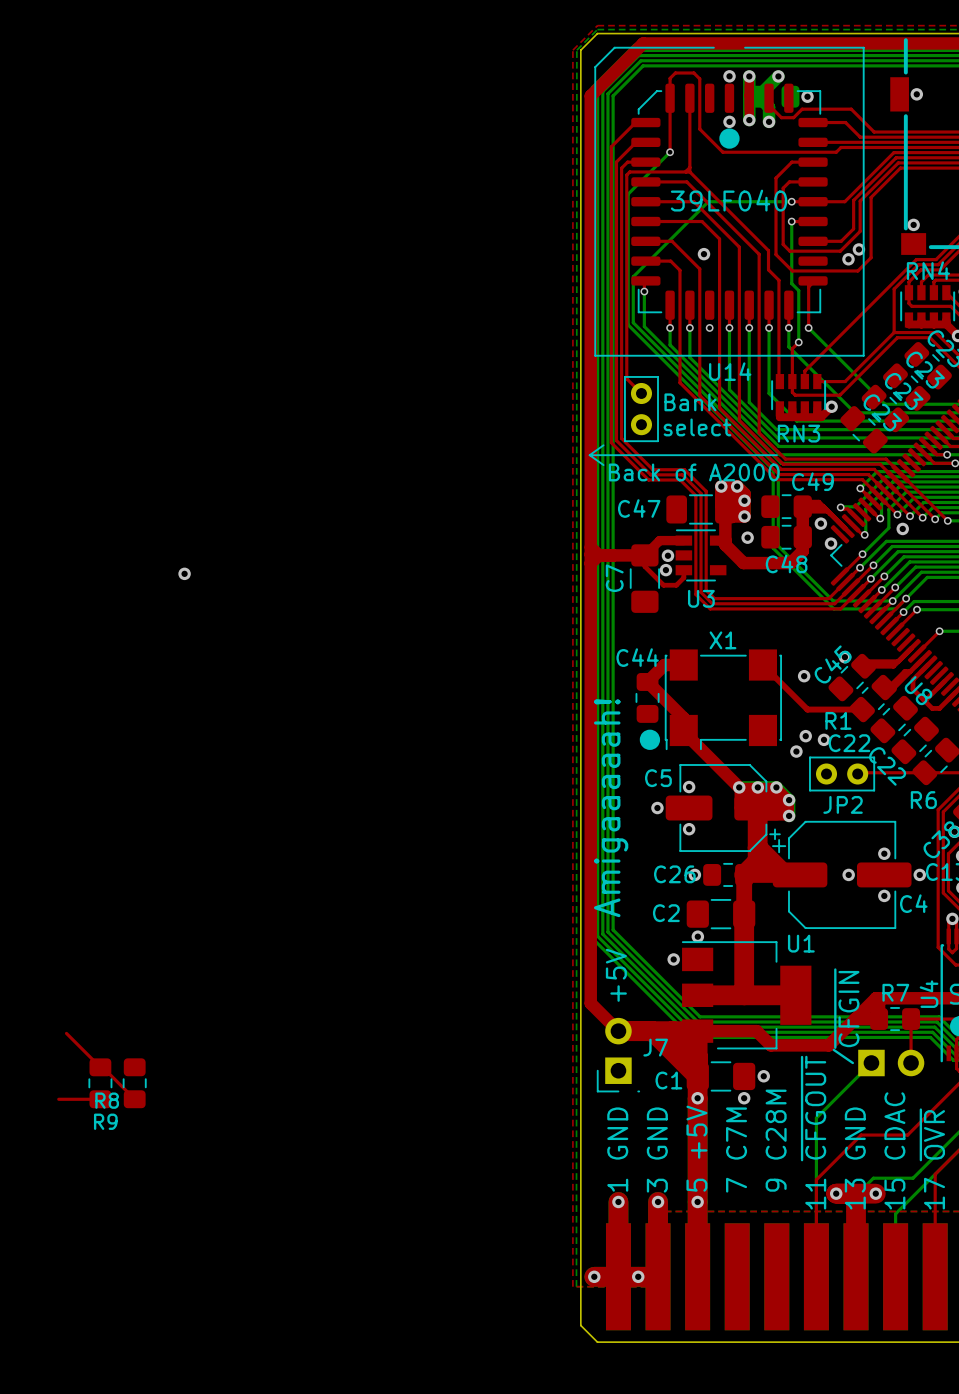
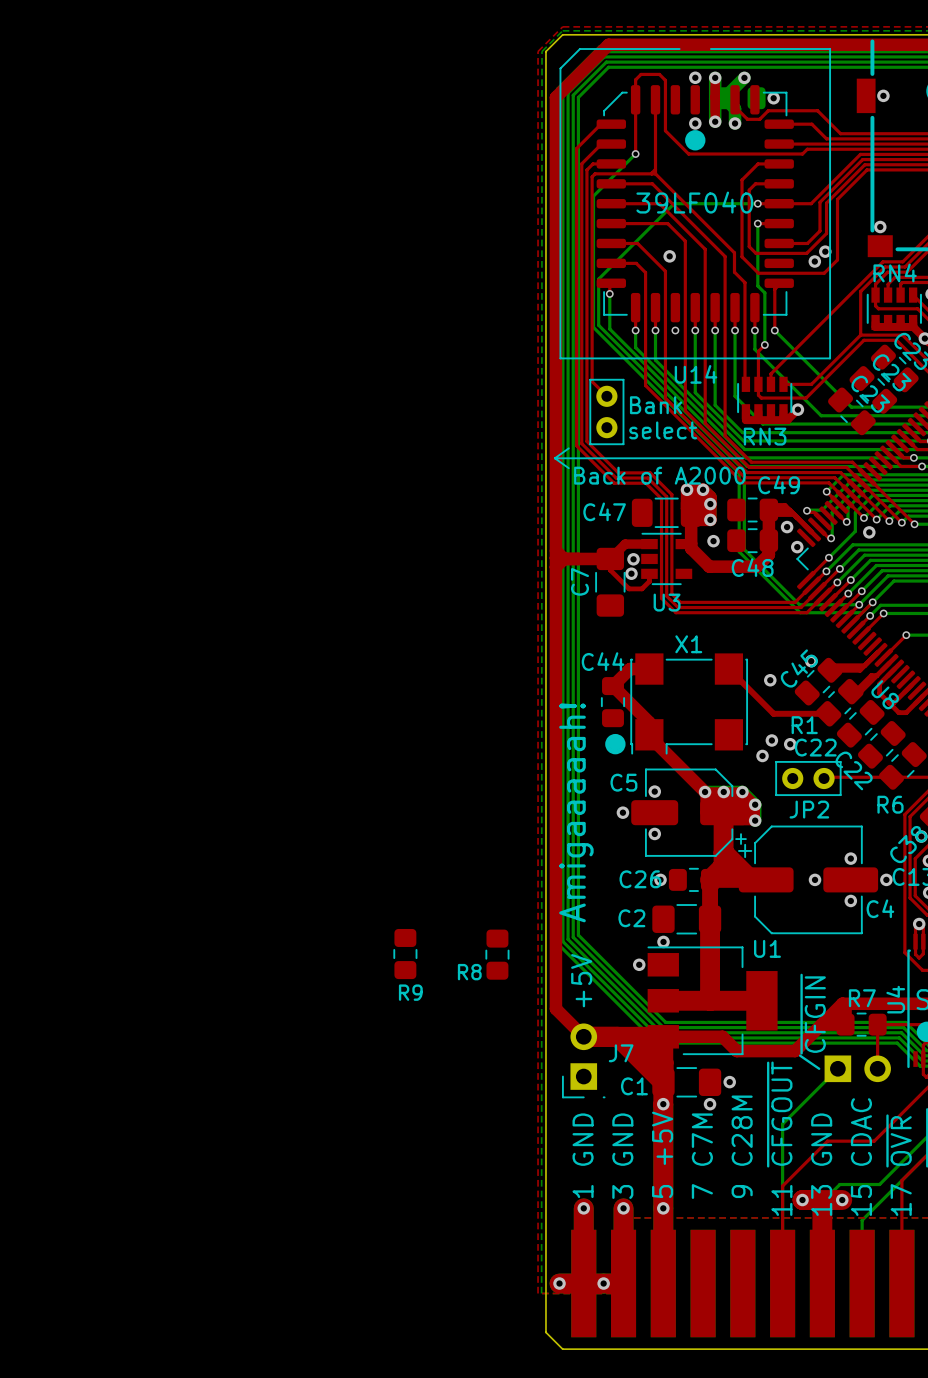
C23: (864, 429) -> none
via: (184, 573) -> none
top track: (66, 1033) (100, 1067) -> none
top track: (102, 1067) (134, 1099) -> none
R9 position: (100, 1083) -> (405, 954)
R8 position: (134, 1083) -> (497, 954)
top track: (58, 1099) (100, 1099) -> none

